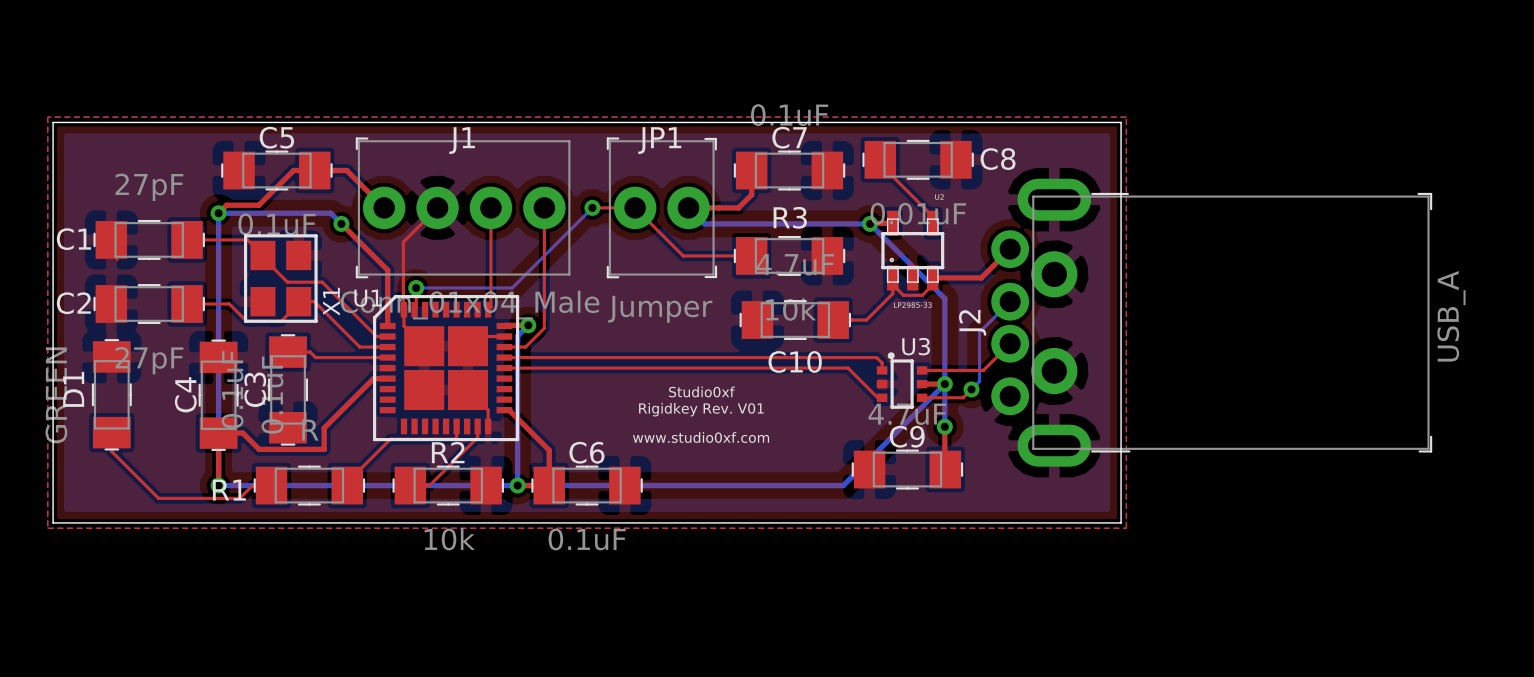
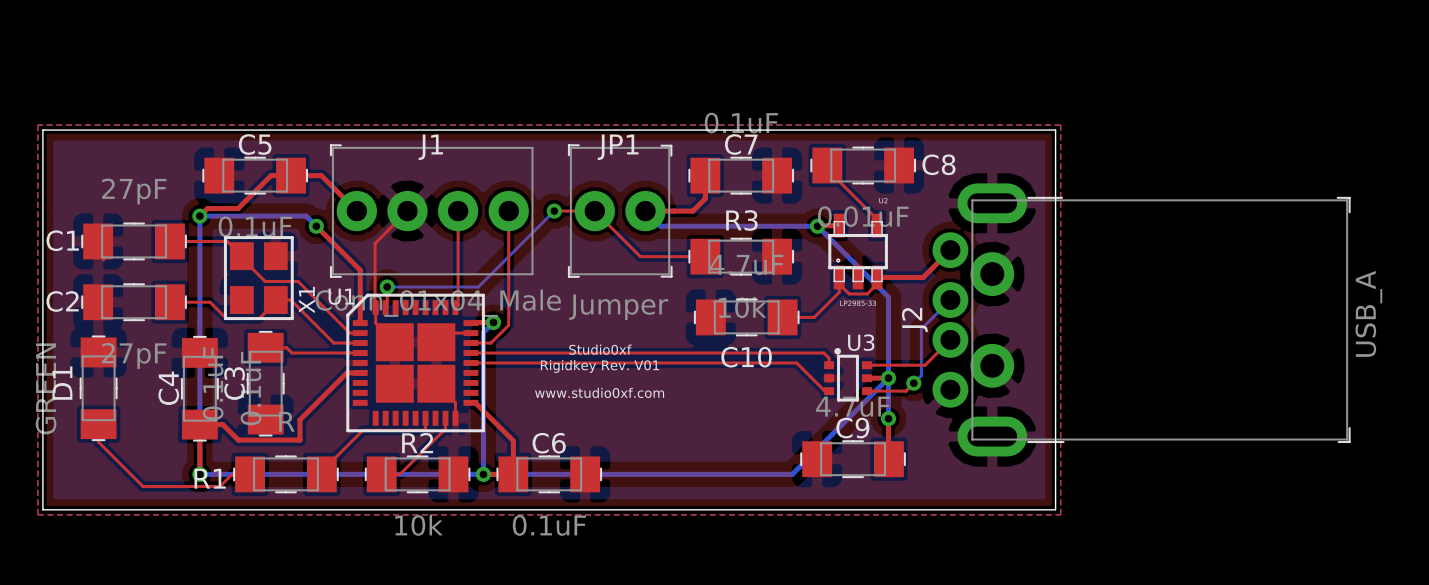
text position: Studio0xf (701, 391) -> Studio0xf (600, 349)
text position: Rigidkey Rev. V01 (701, 409) -> Rigidkey Rev. V01 (599, 366)
text position: www.studio0xf.com (701, 437) -> www.studio0xf.com (599, 392)

